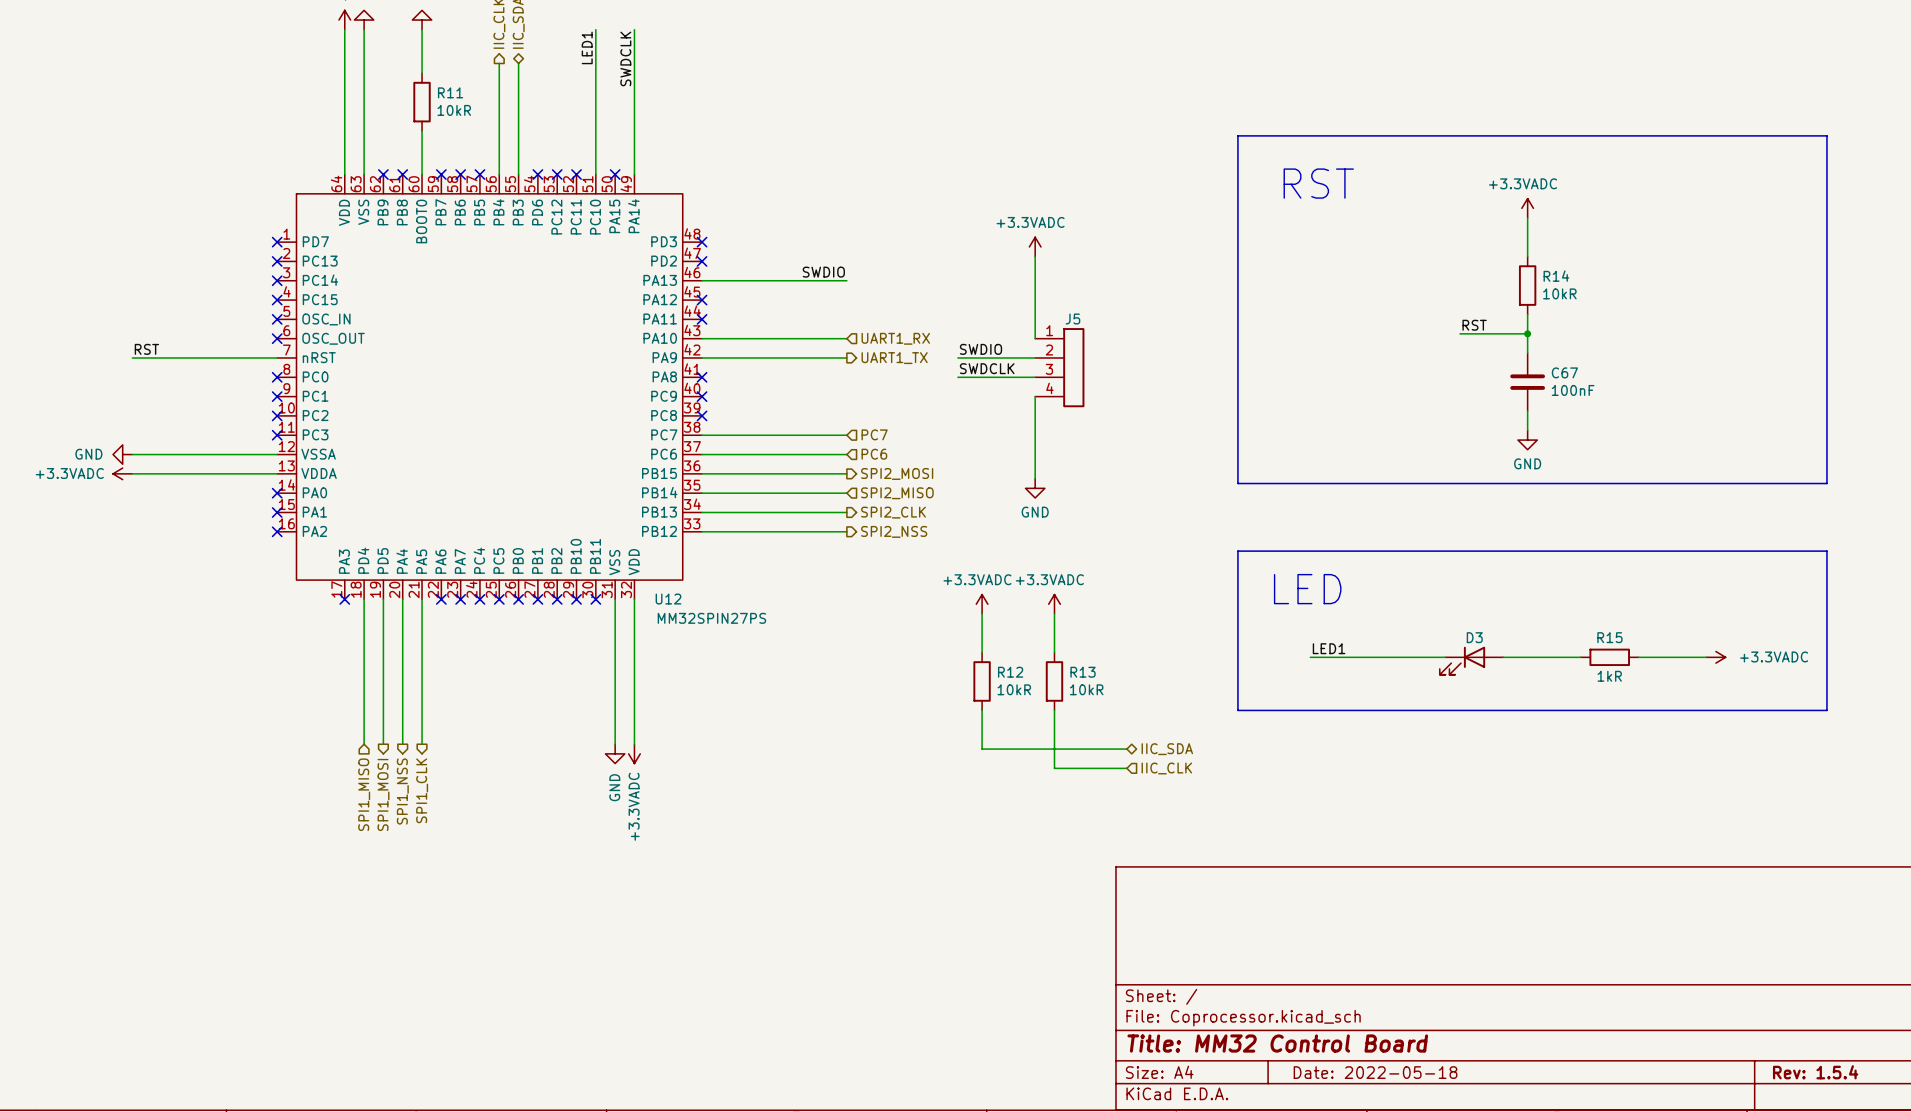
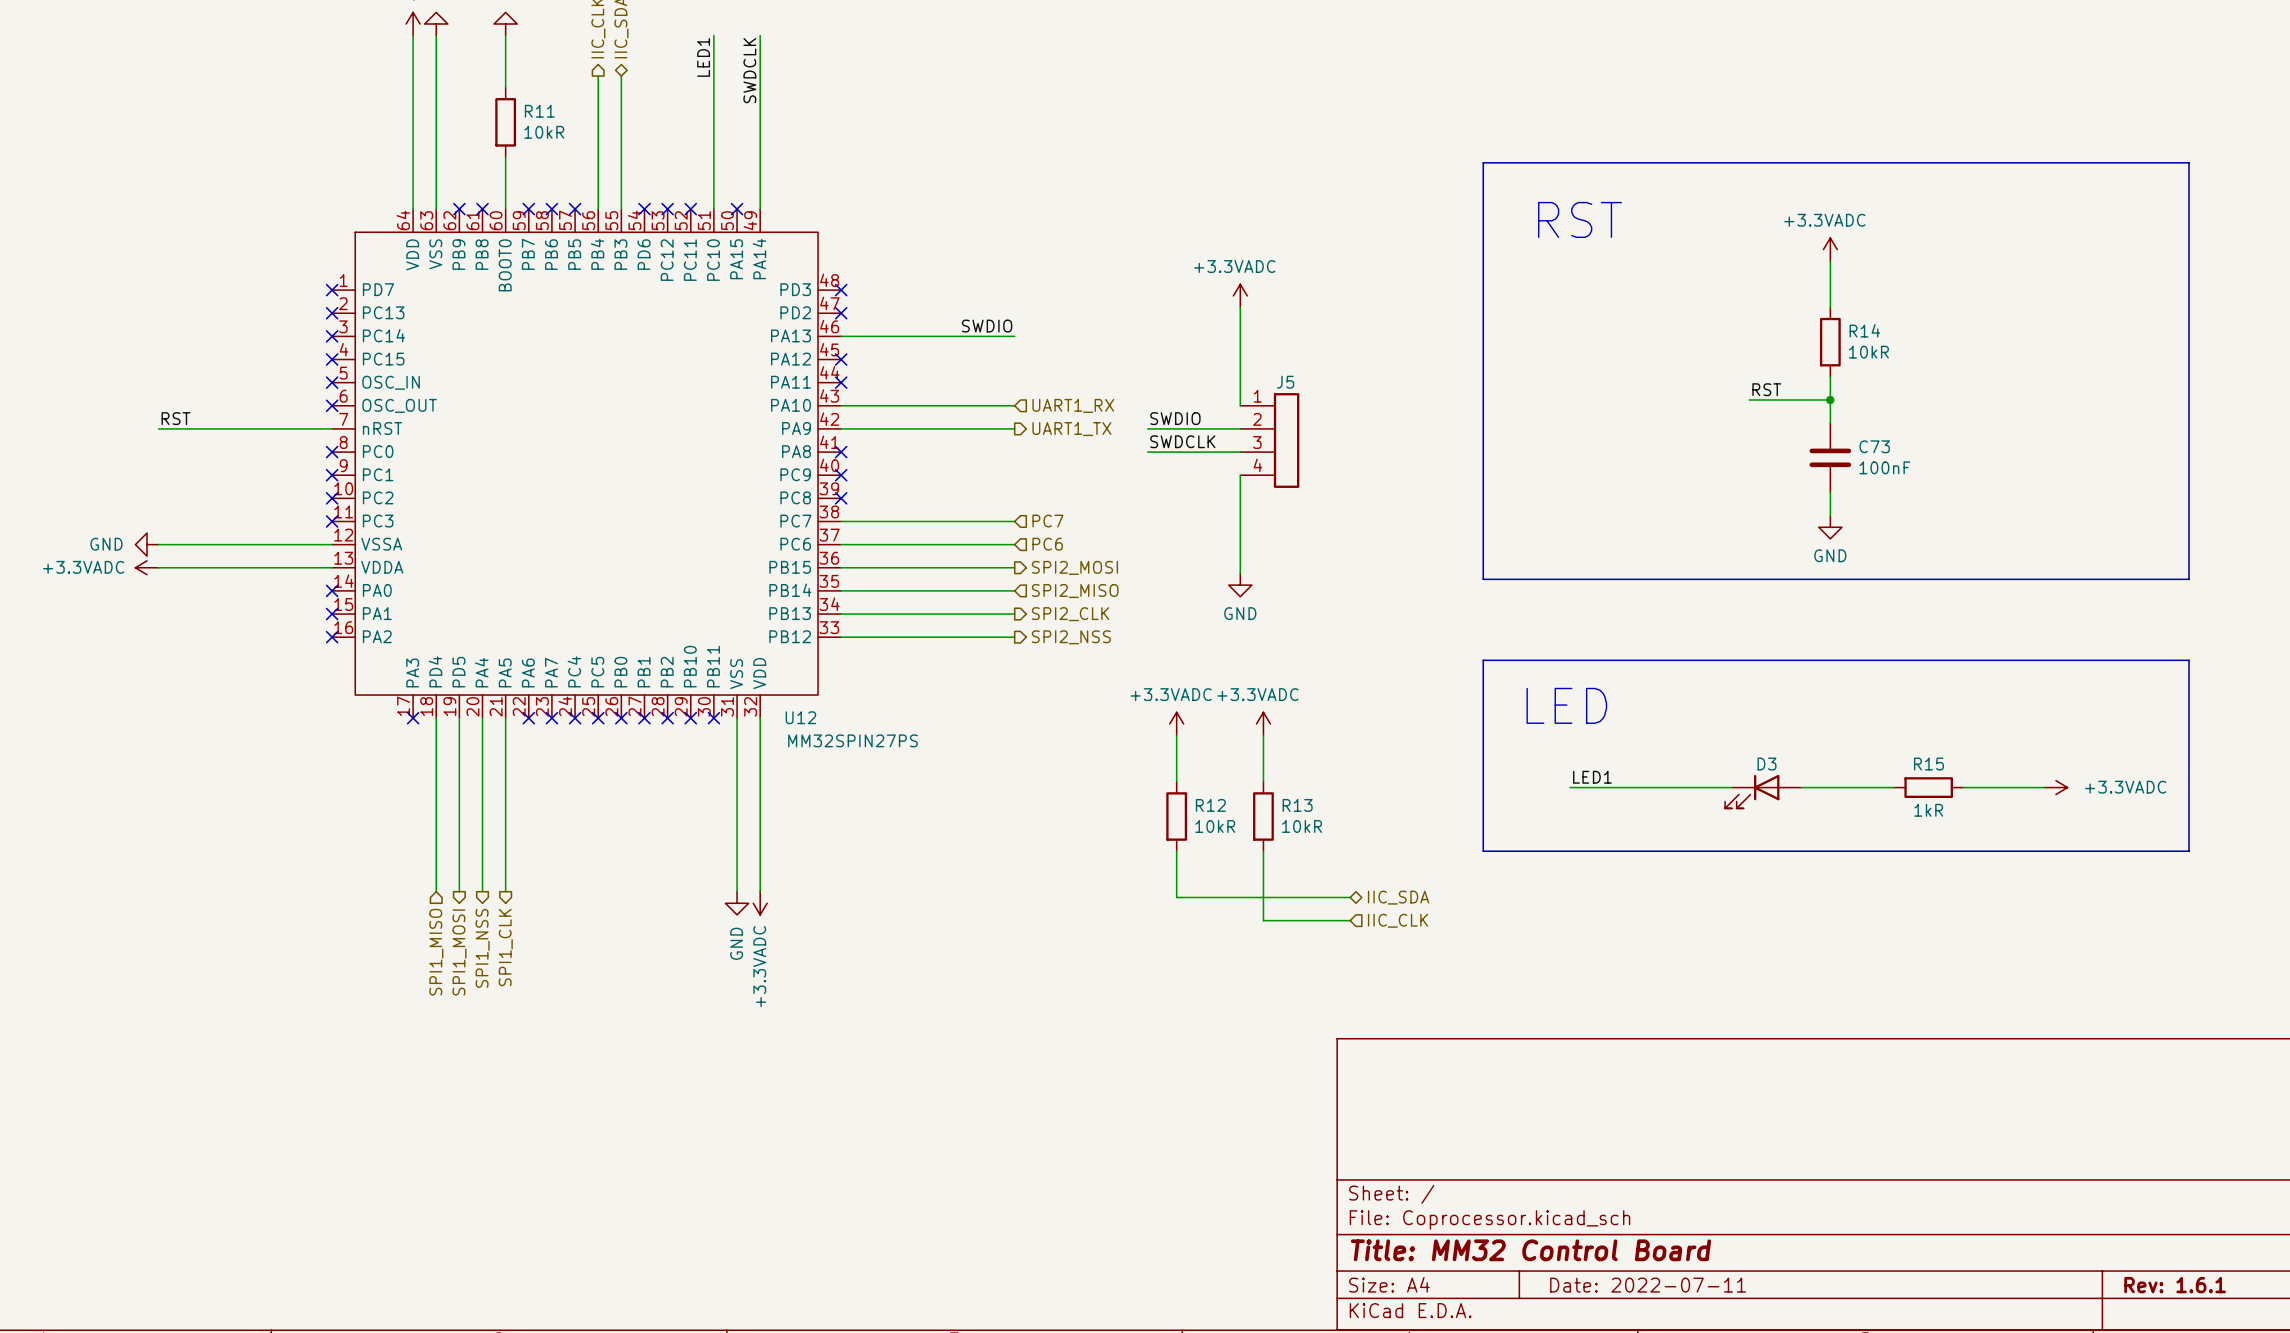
C67 name: C67 (1564, 372) -> C73 (1874, 446)
title block: Date: 2022-05-18 (1375, 1072) -> Date: 2022-07-11 (1648, 1285)
title block: Rev: 1.5.4 (1815, 1072) -> Rev: 1.6.1 (2175, 1285)

